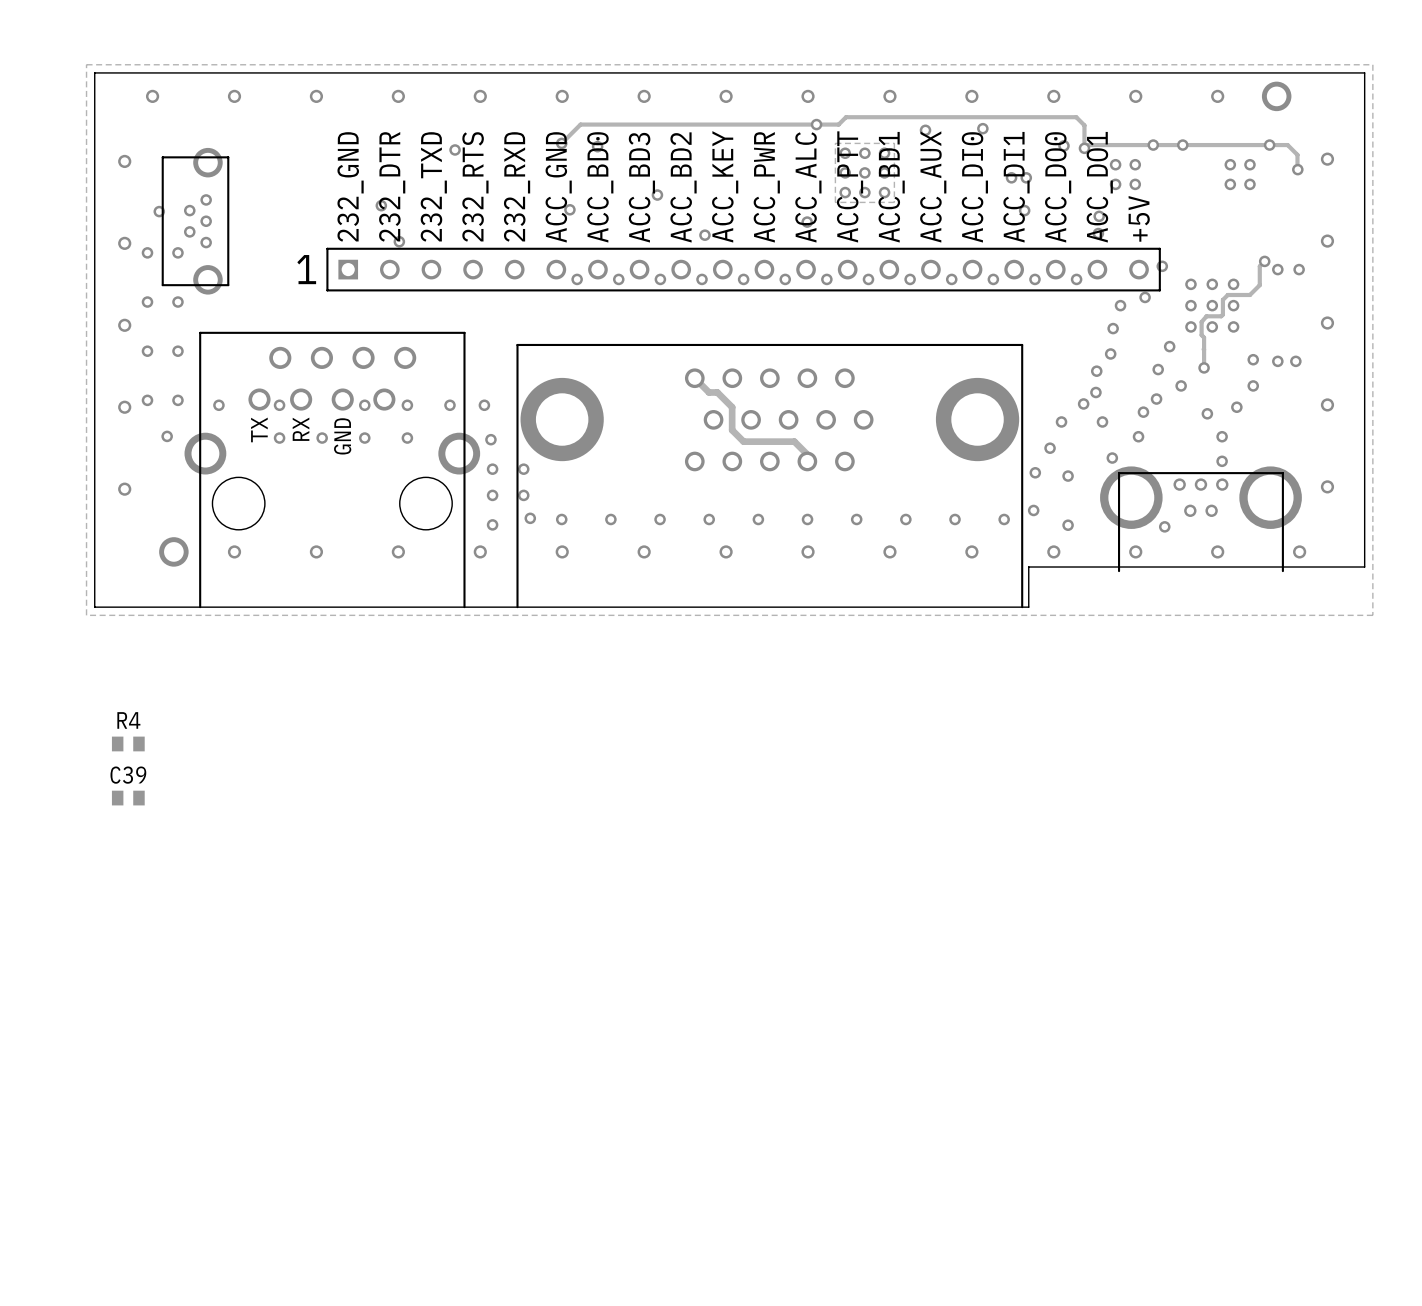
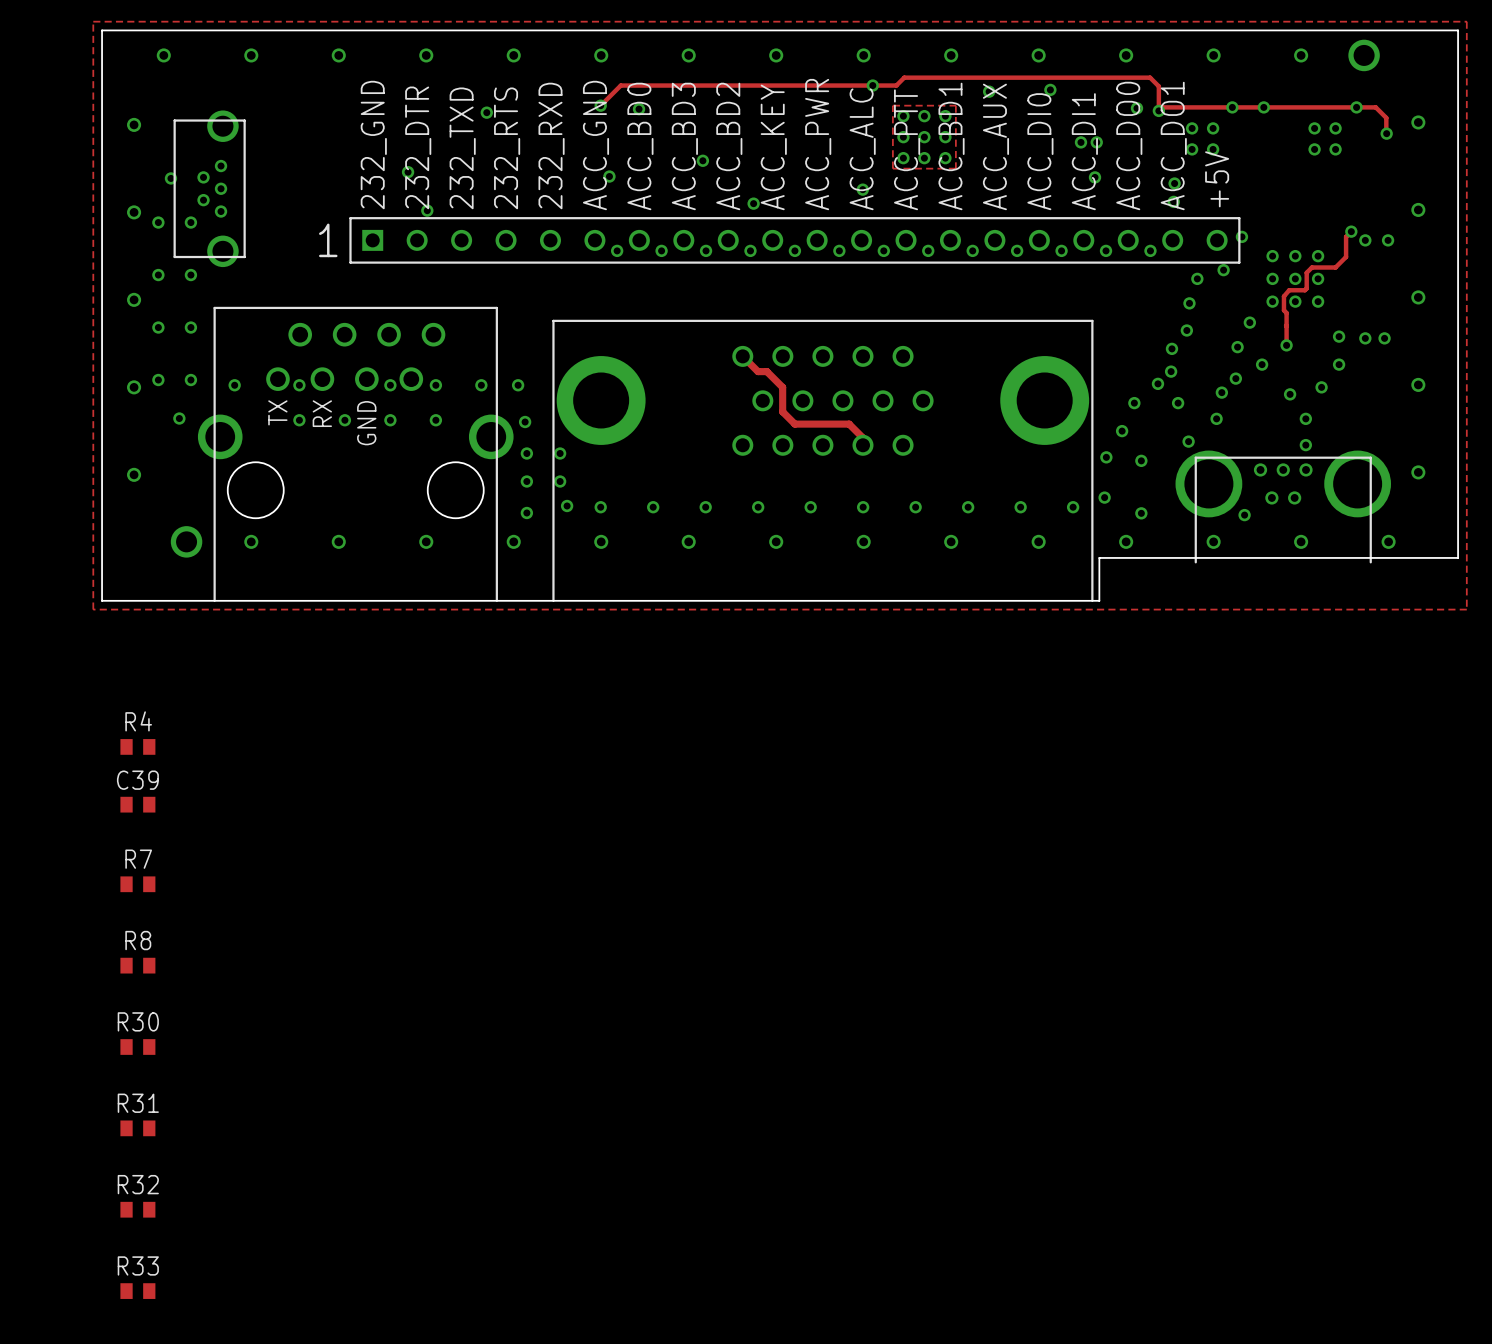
R7: none -> (137, 884)
R8: none -> (137, 965)
R30: none -> (137, 1047)
R31: none -> (137, 1128)
R32: none -> (137, 1209)
R33: none -> (137, 1291)

